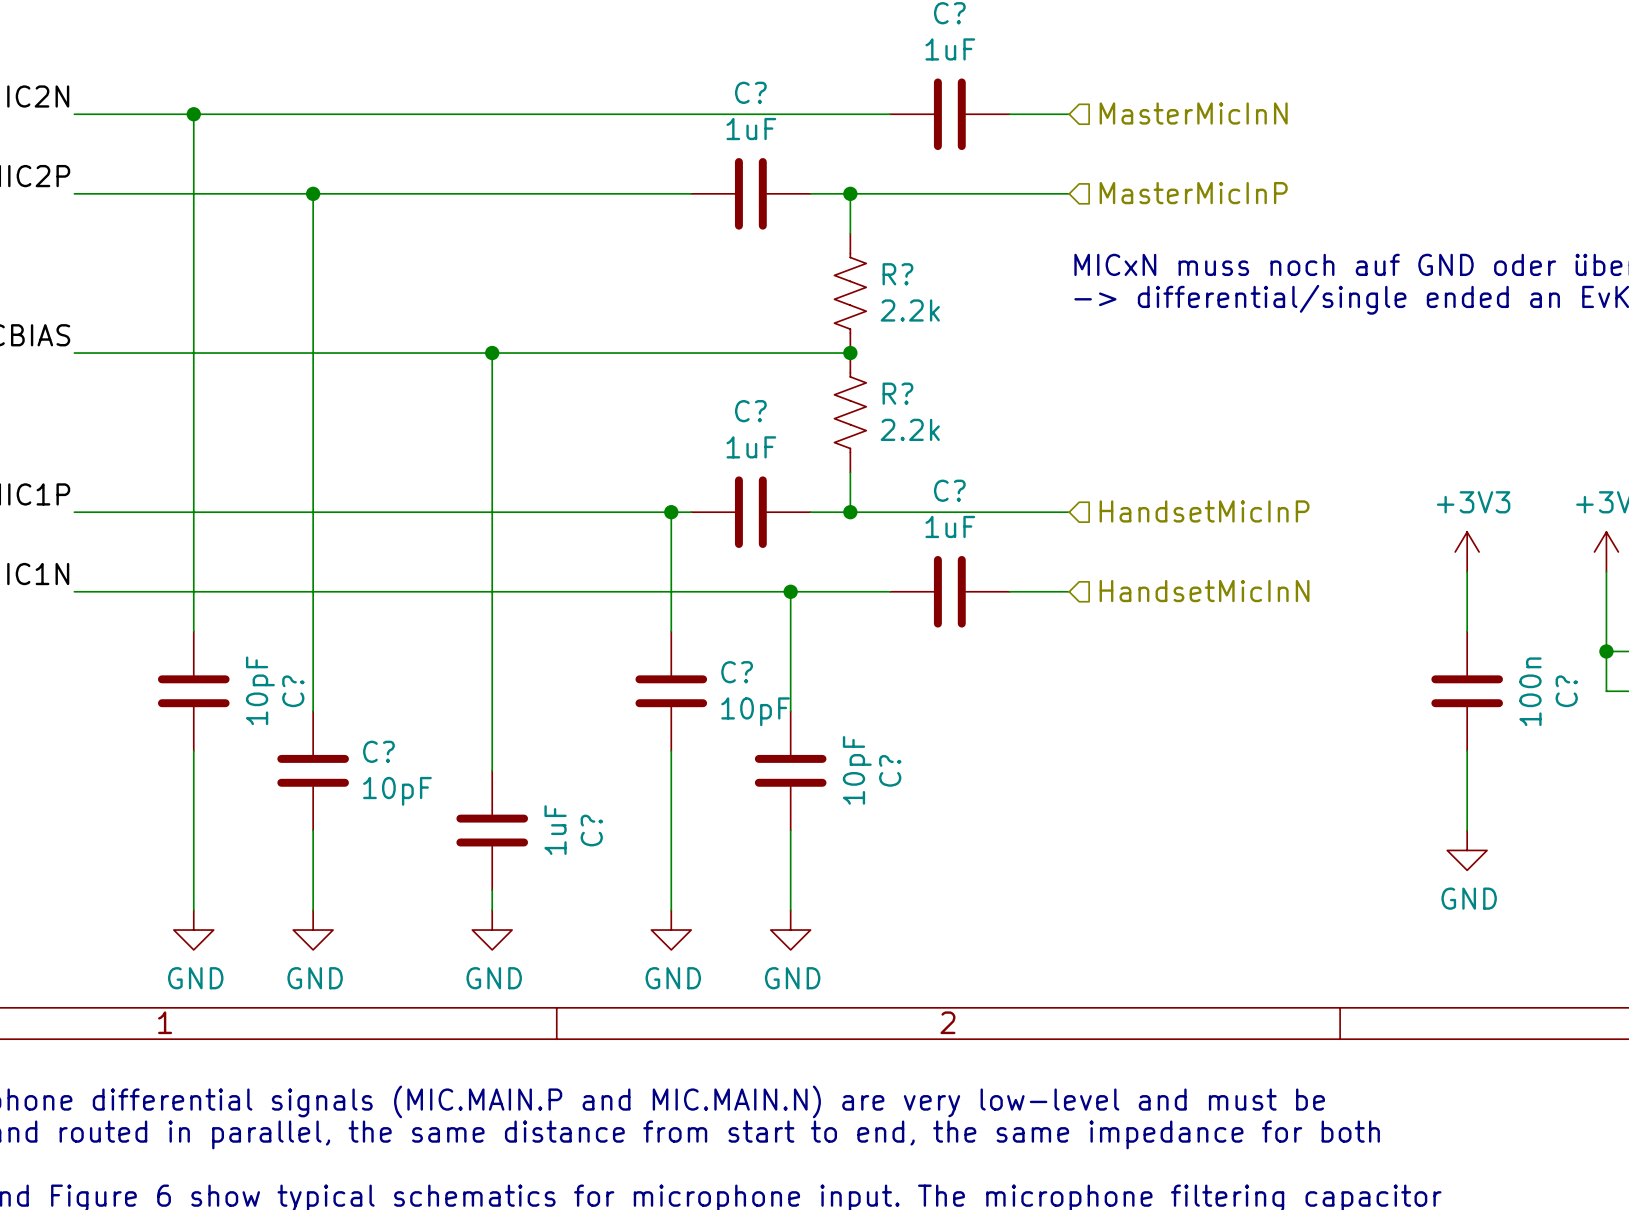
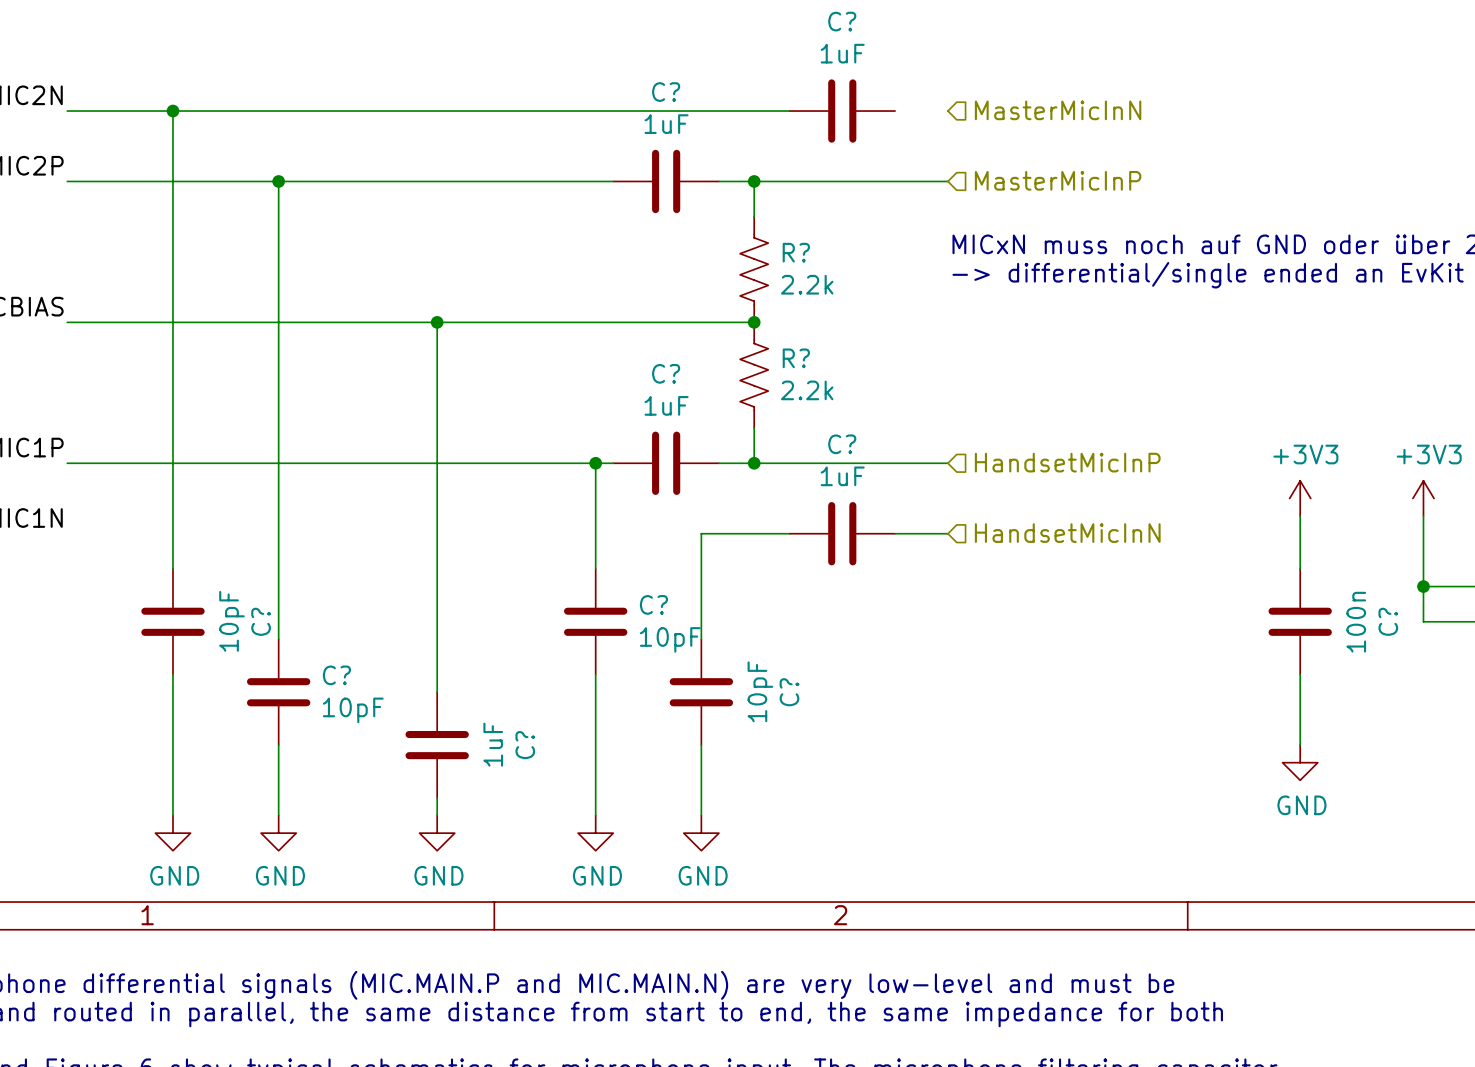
wire: (1009, 114) (1069, 114) -> none
wire: (74, 591) (790, 591) -> none
junction: (790, 591) -> none

